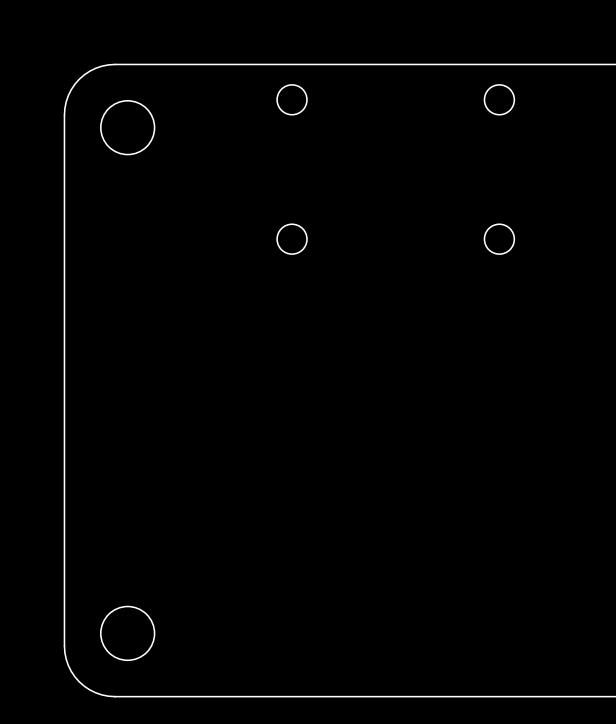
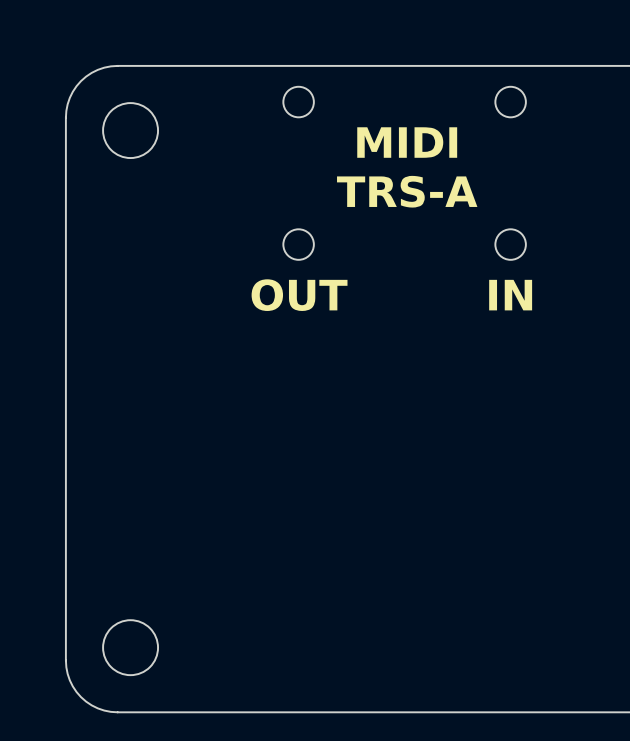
text: none -> MIDI (407, 142)
text: none -> TRS-A (407, 191)
text: none -> OUT (299, 295)
text: none -> IN (510, 295)

